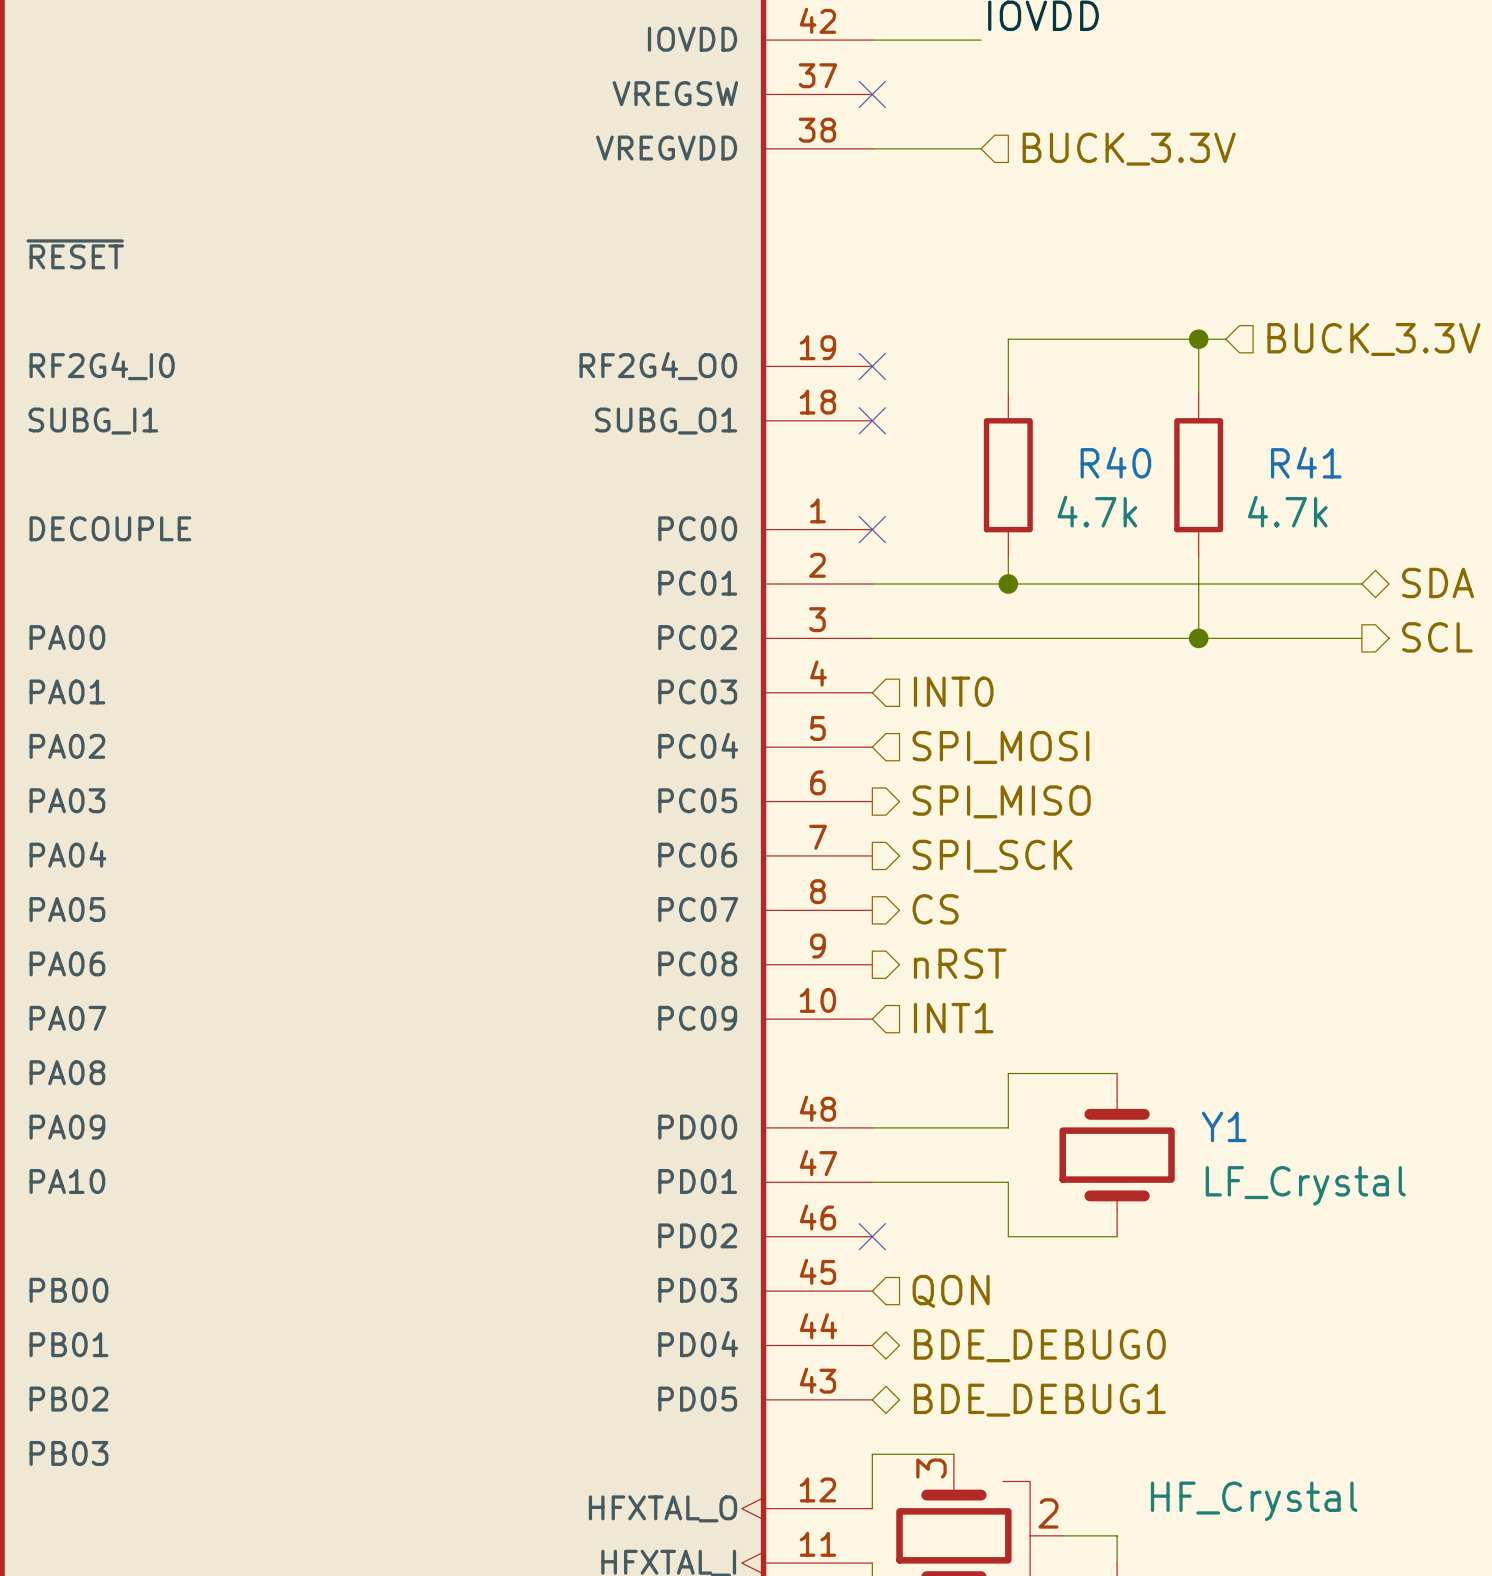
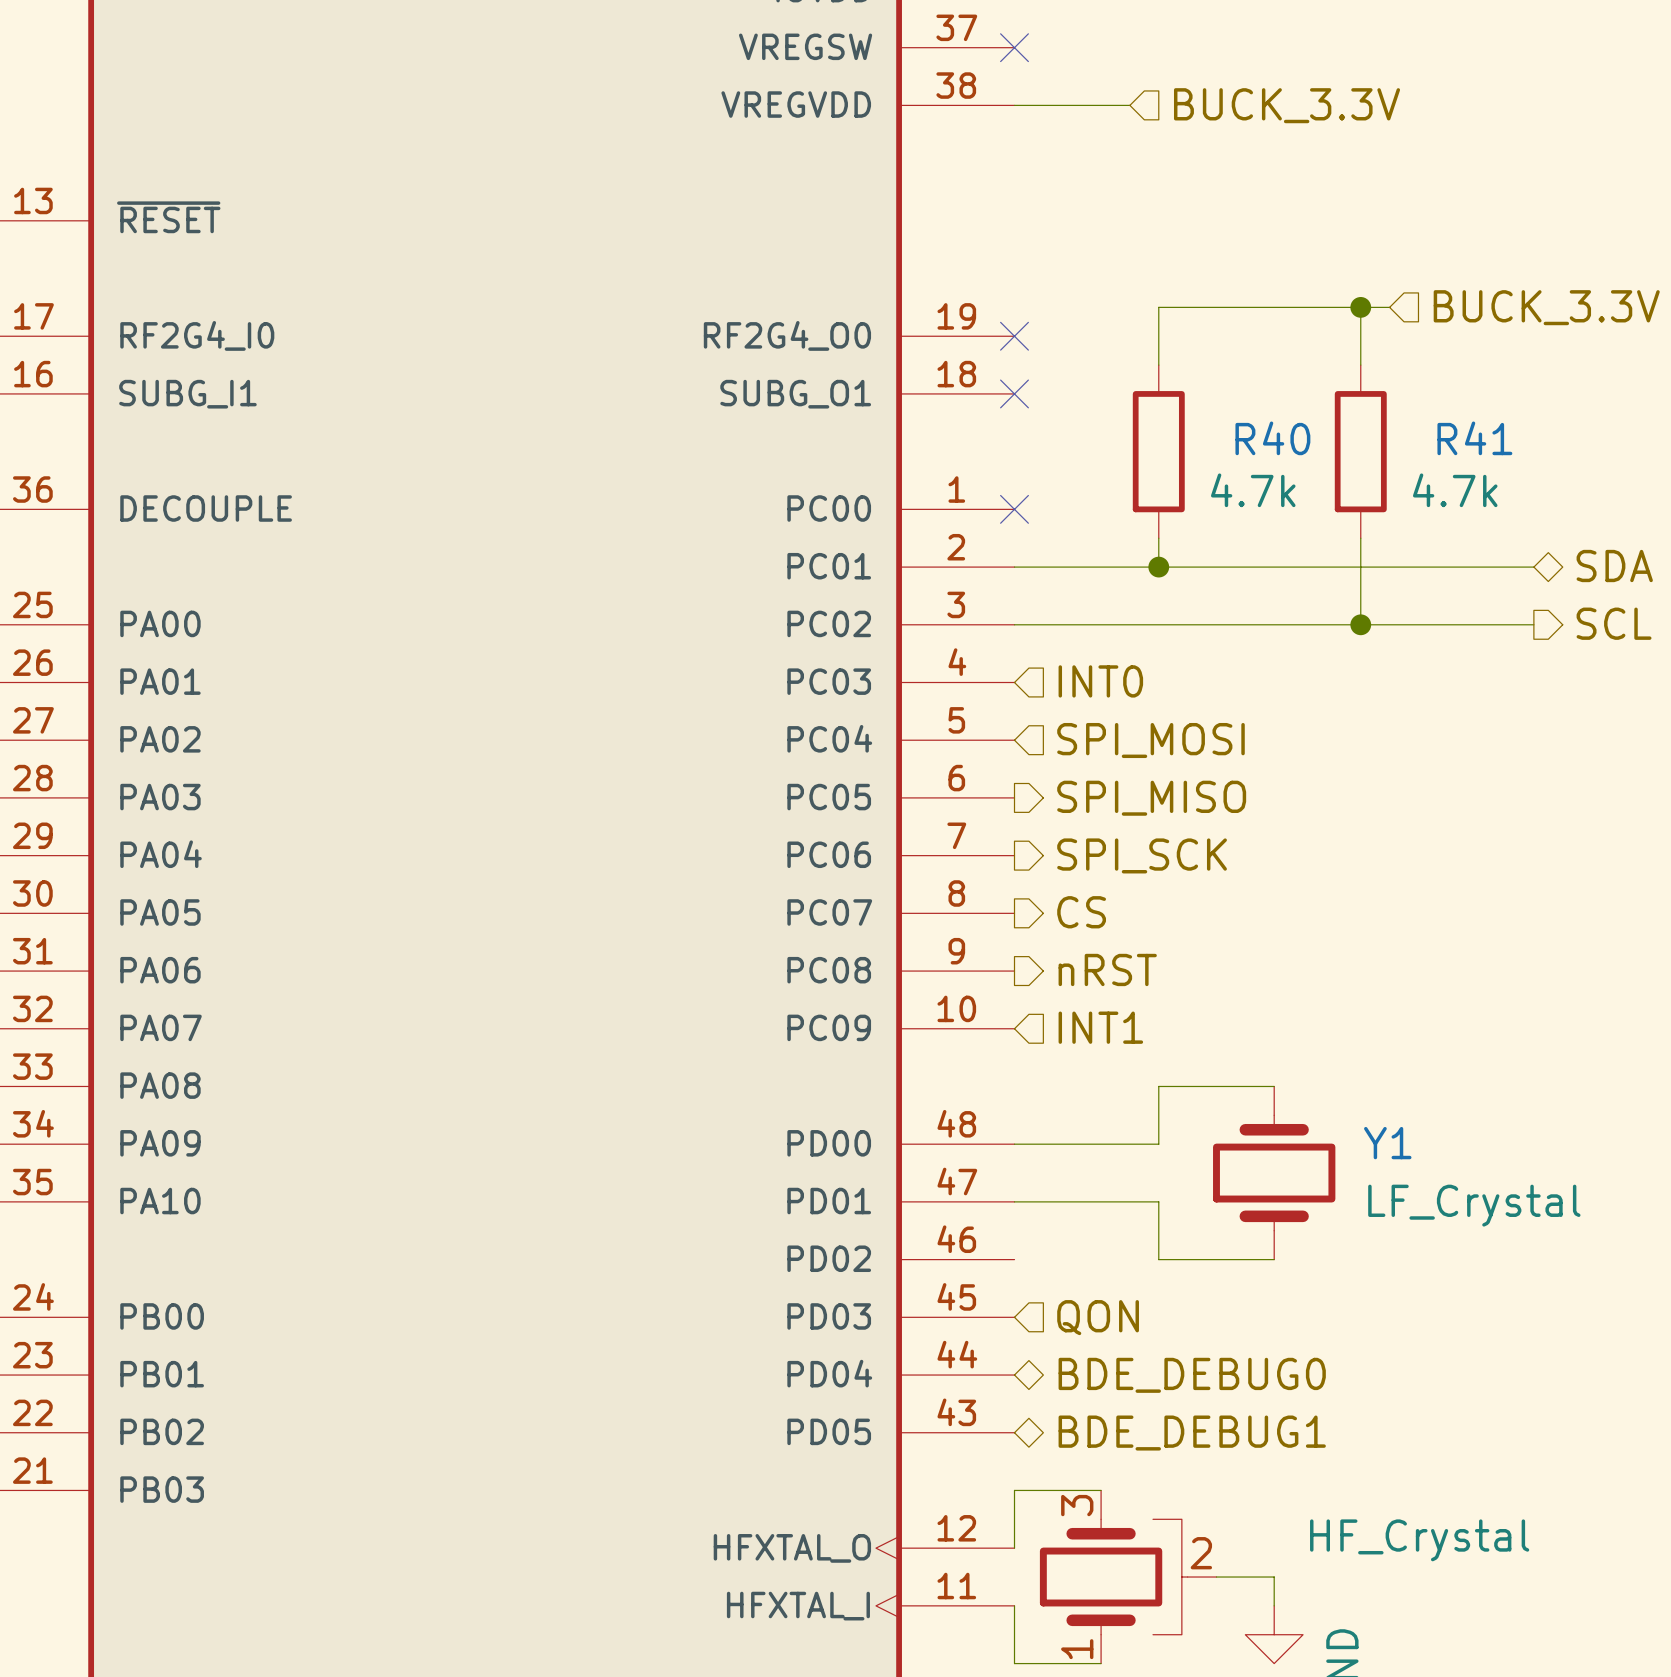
no-connect mark: (872, 1236) -> none

